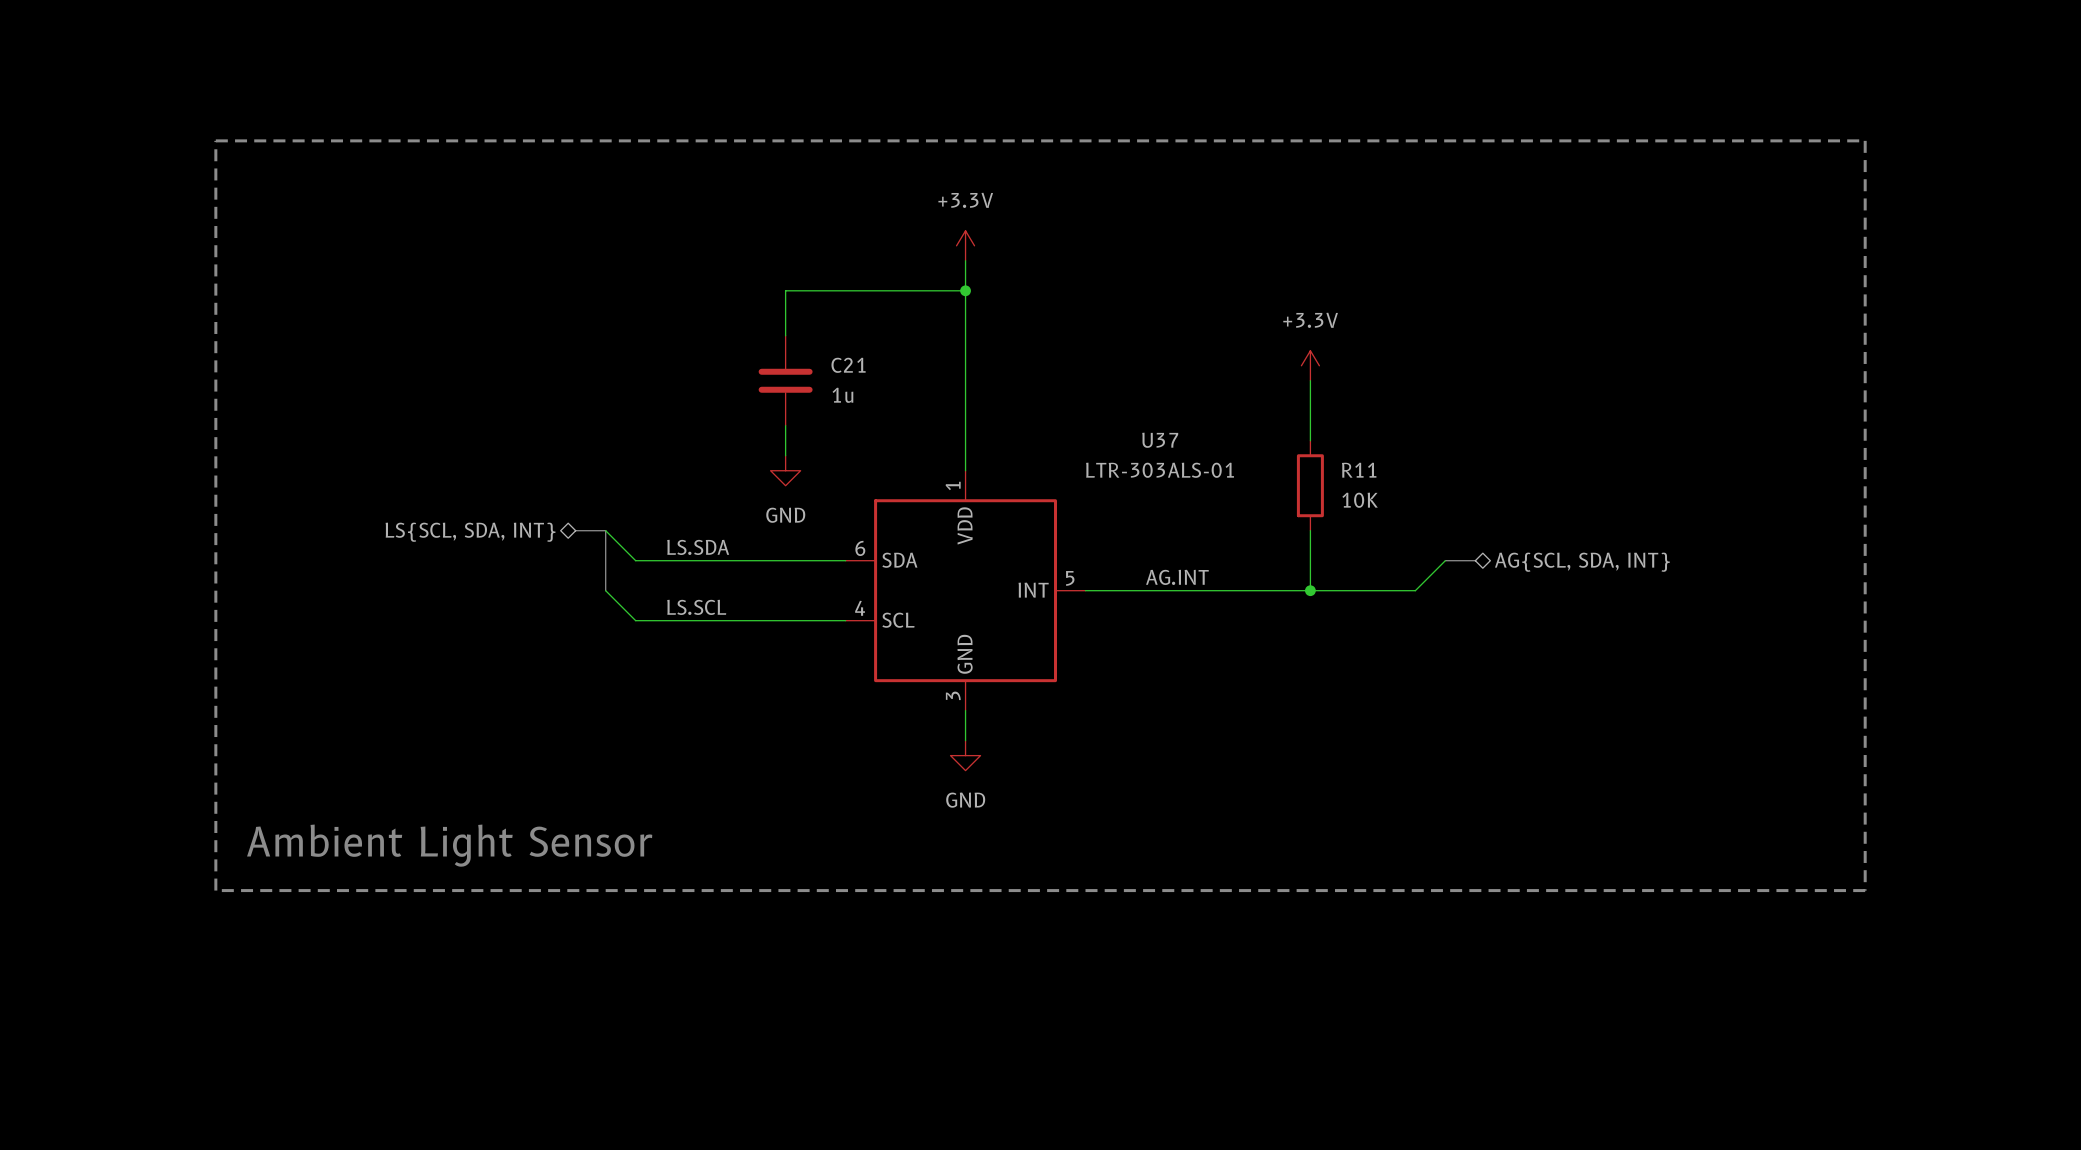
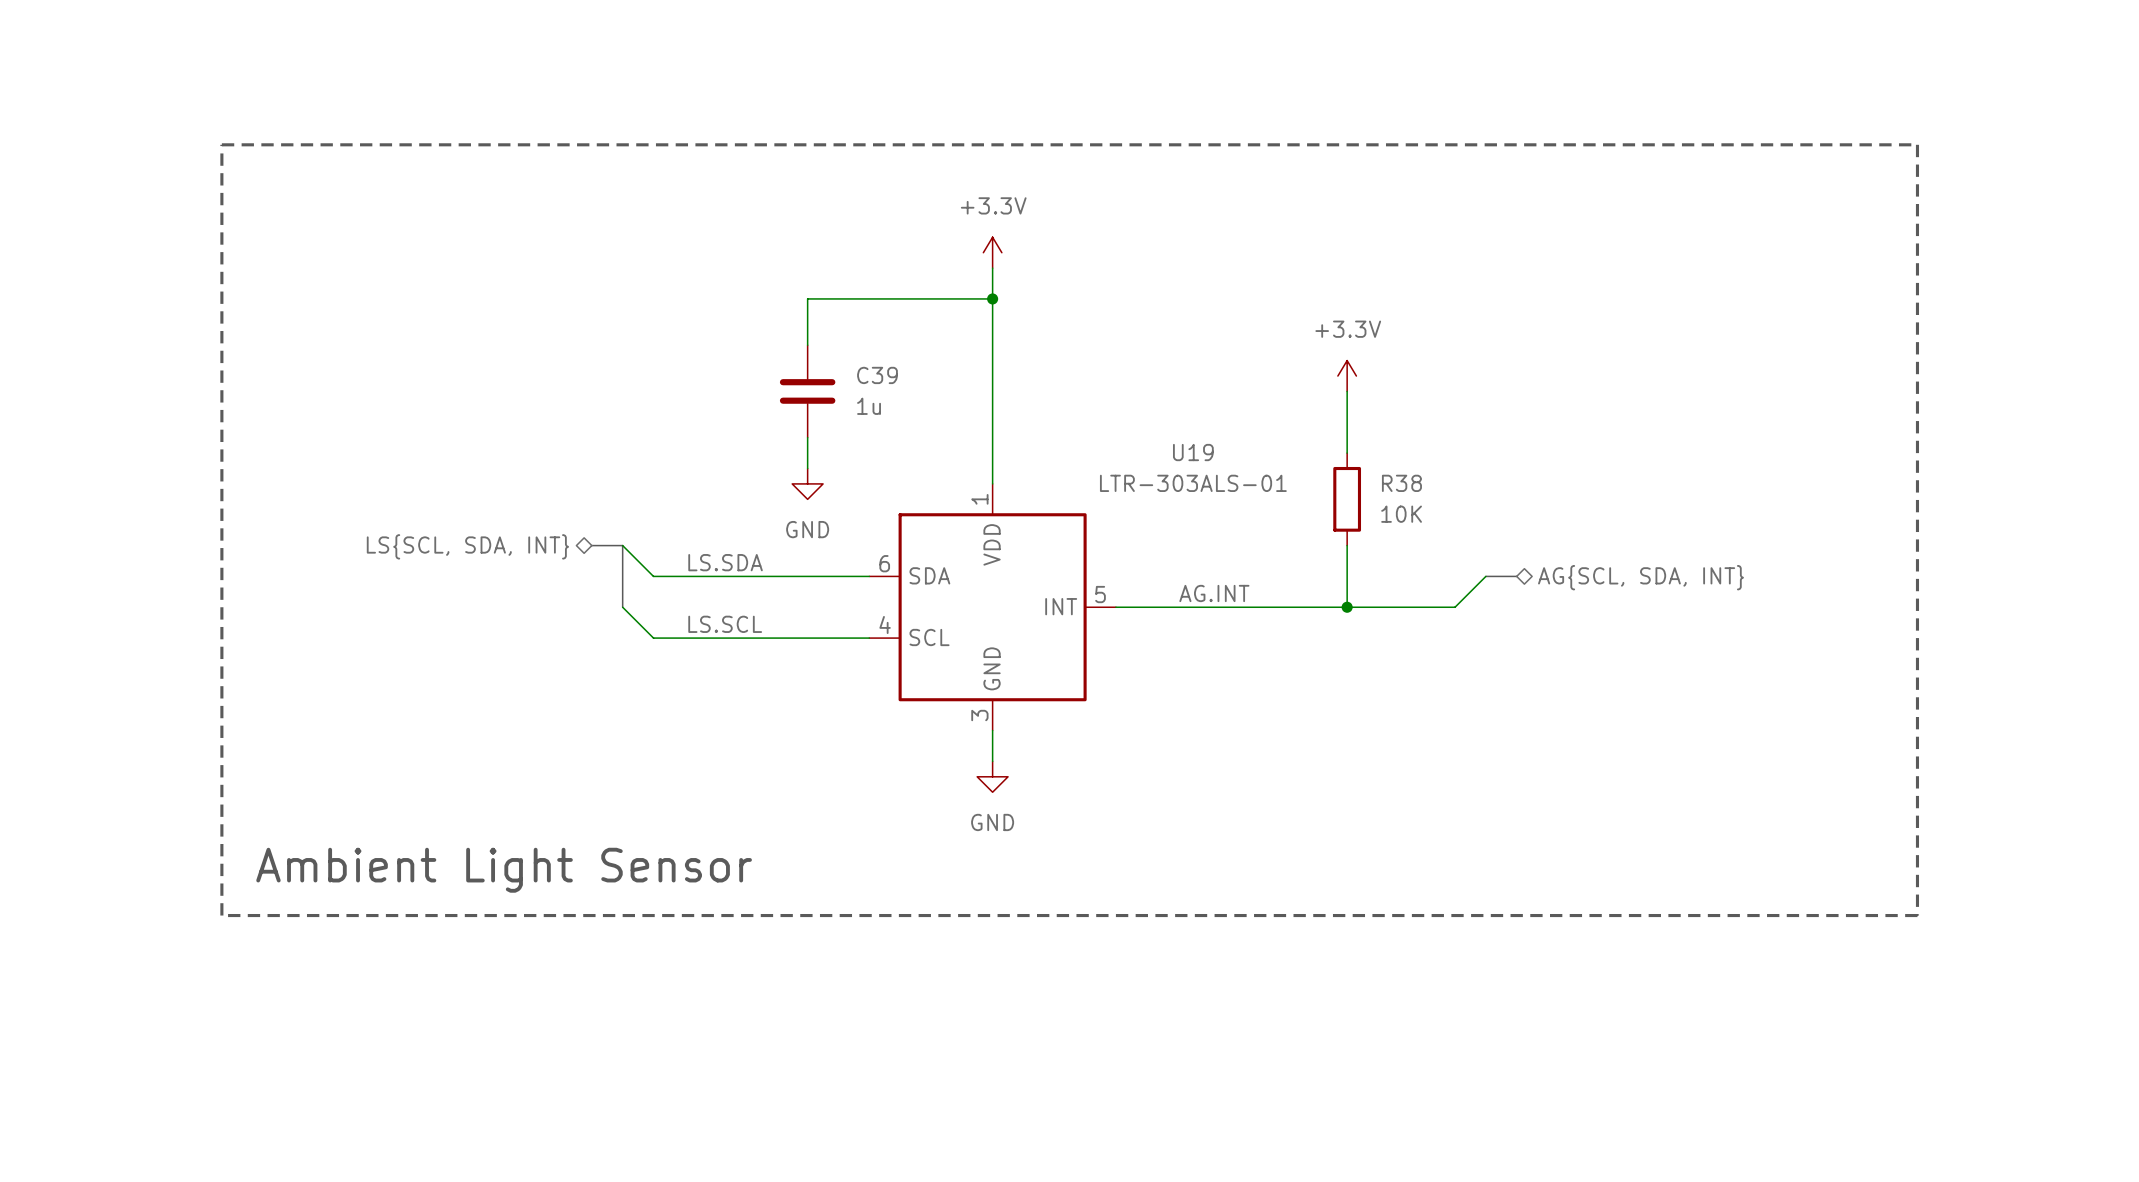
C21 name: C21 (848, 365) -> C39 (877, 375)
U37 name: U37 (1160, 440) -> U19 (1193, 452)
R11 name: R11 (1359, 470) -> R38 (1401, 483)

